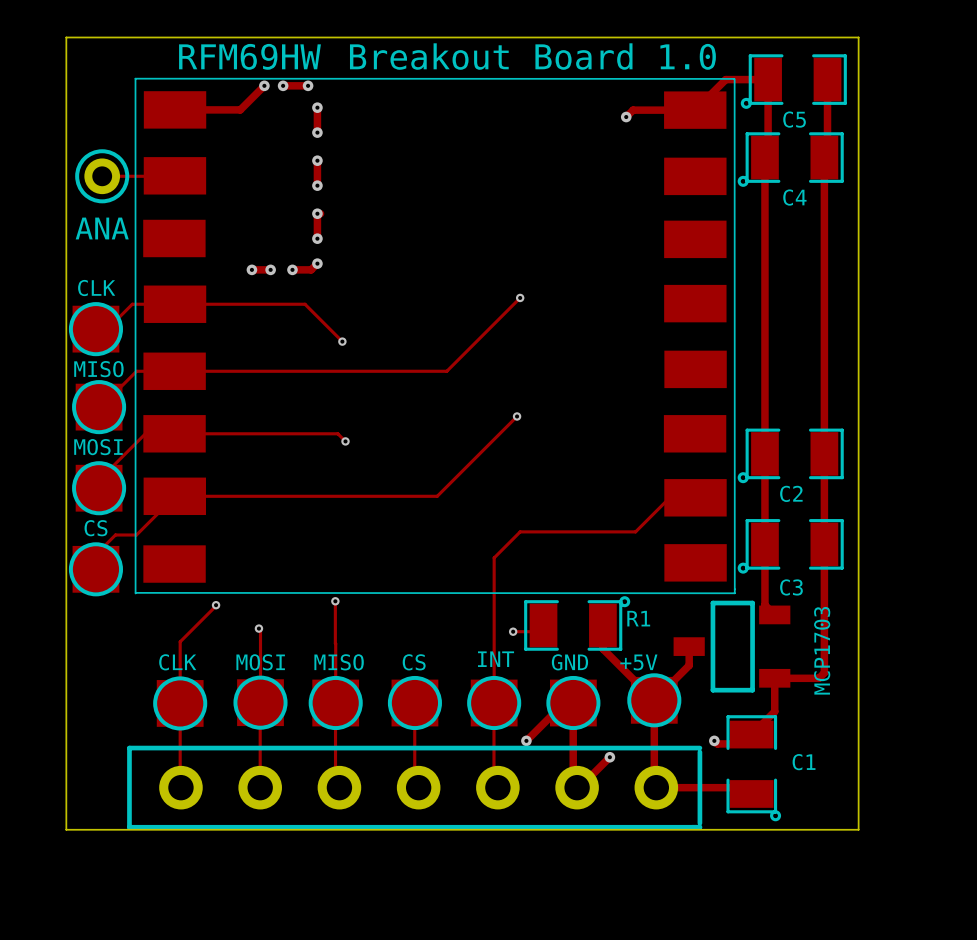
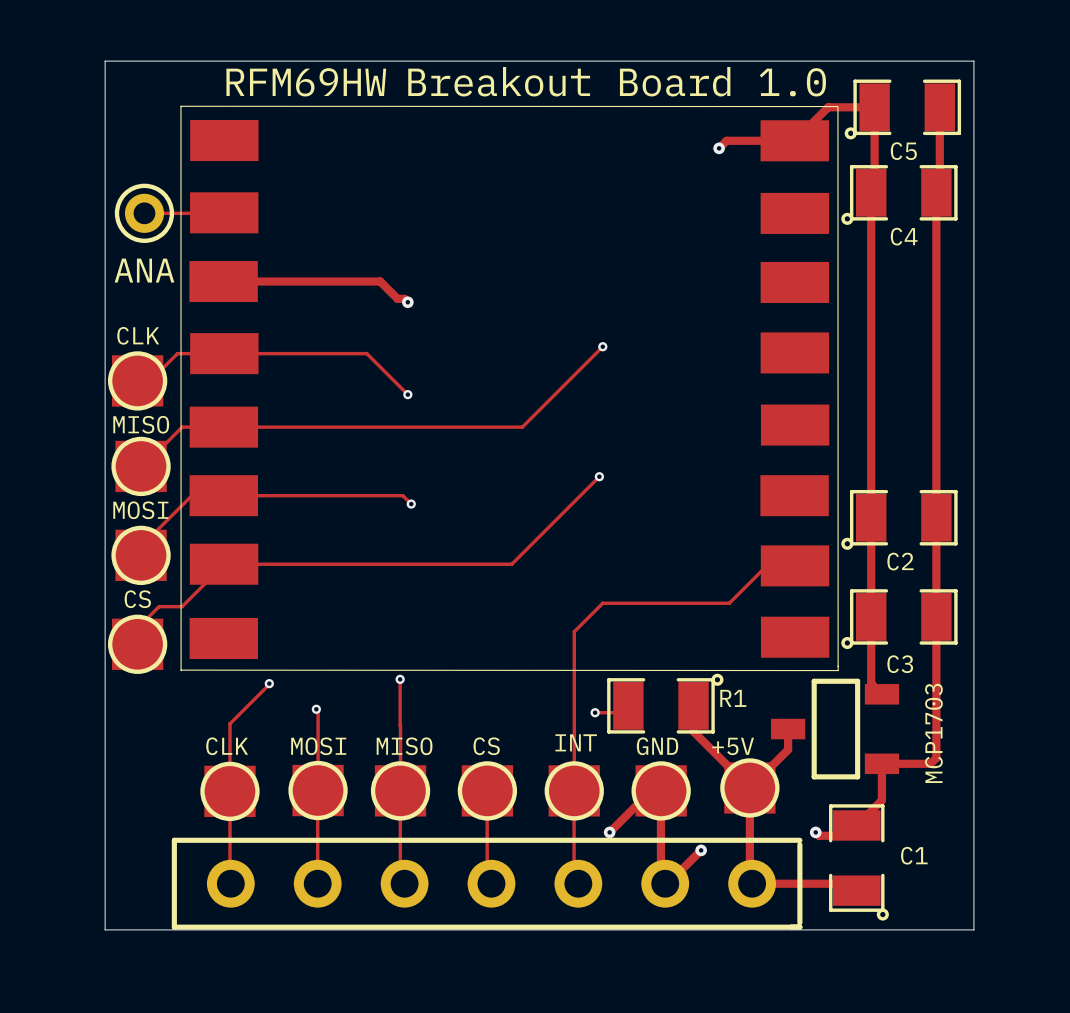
track: (264, 85) (240, 109) (175, 109) -> none
via: (264, 85) -> none
track: (283, 85) (308, 85) -> none
via: (283, 85) -> none
via: (308, 85) -> none
track: (317, 107) (317, 132) -> none
via: (317, 107) -> none
via: (317, 132) -> none
track: (317, 160) (317, 185) -> none
via: (317, 160) -> none
via: (317, 185) -> none
via: (317, 213) -> none
track: (320, 213) (317, 213) (317, 238) -> none
track: none -> (223, 281) (380, 281) (397, 298) (404, 298) (407, 302)
via: (317, 238) -> none
via: none -> (407, 302)
track: (317, 263) (311, 269) (292, 269) -> none
via: (317, 263) -> none
track: (251, 269) (270, 269) -> none
via: (251, 269) -> none
via: (270, 269) -> none
via: (292, 269) -> none

